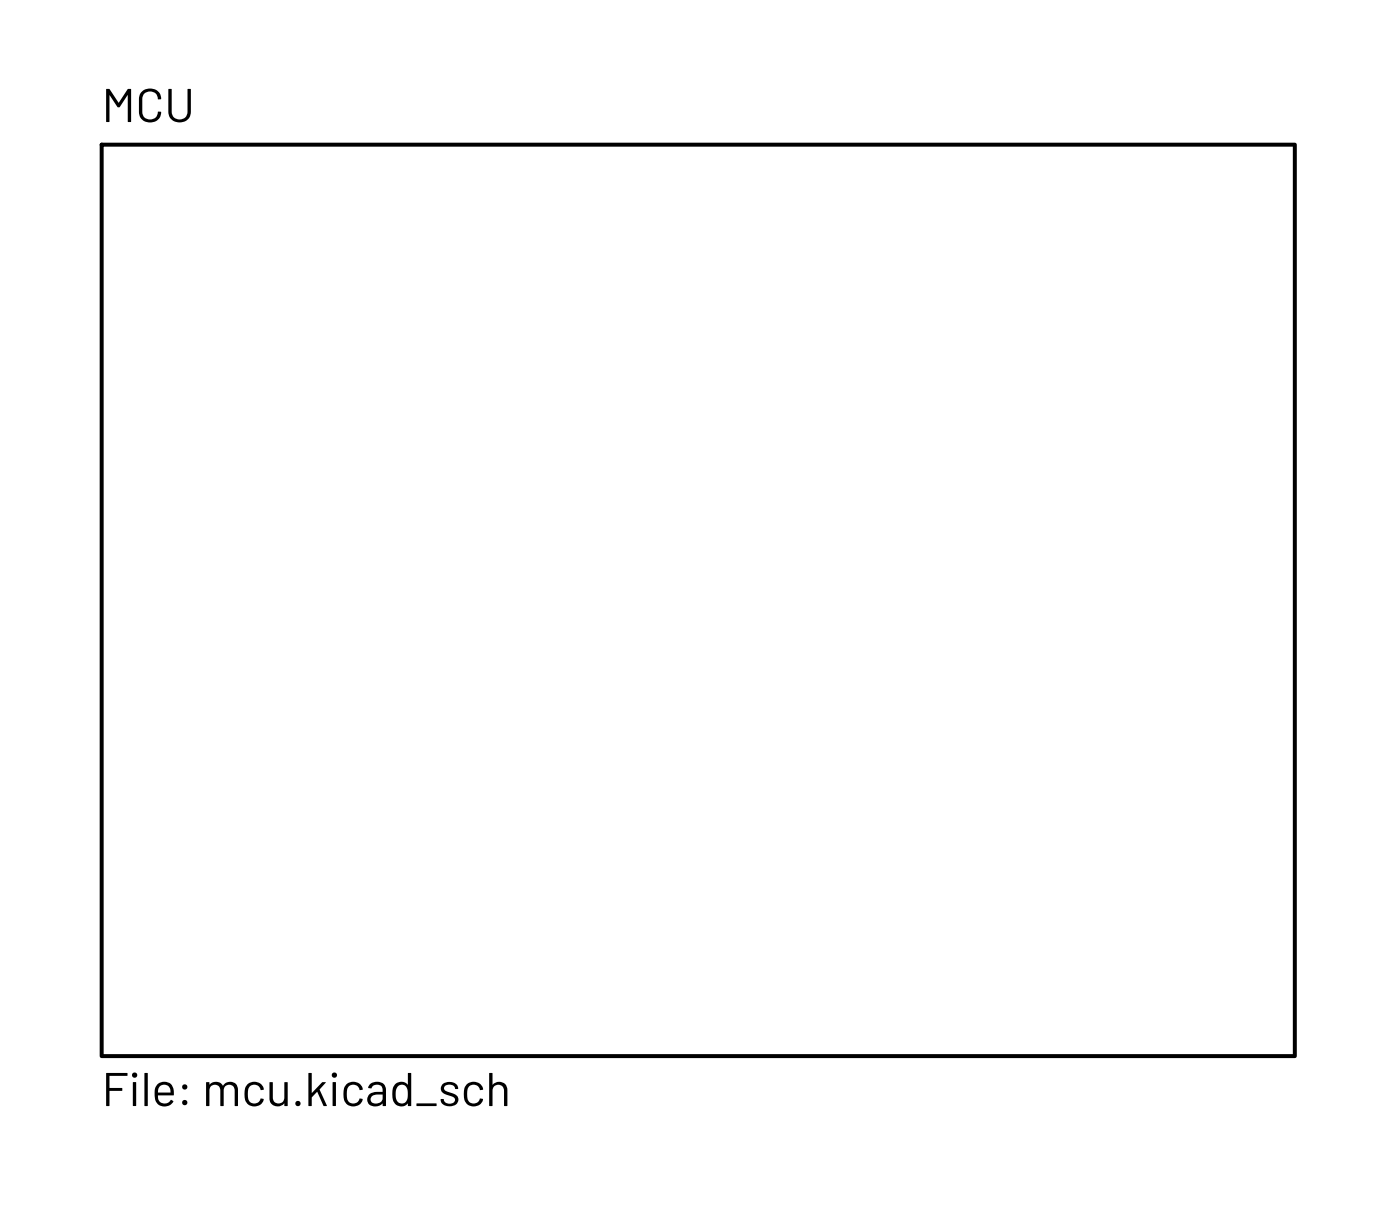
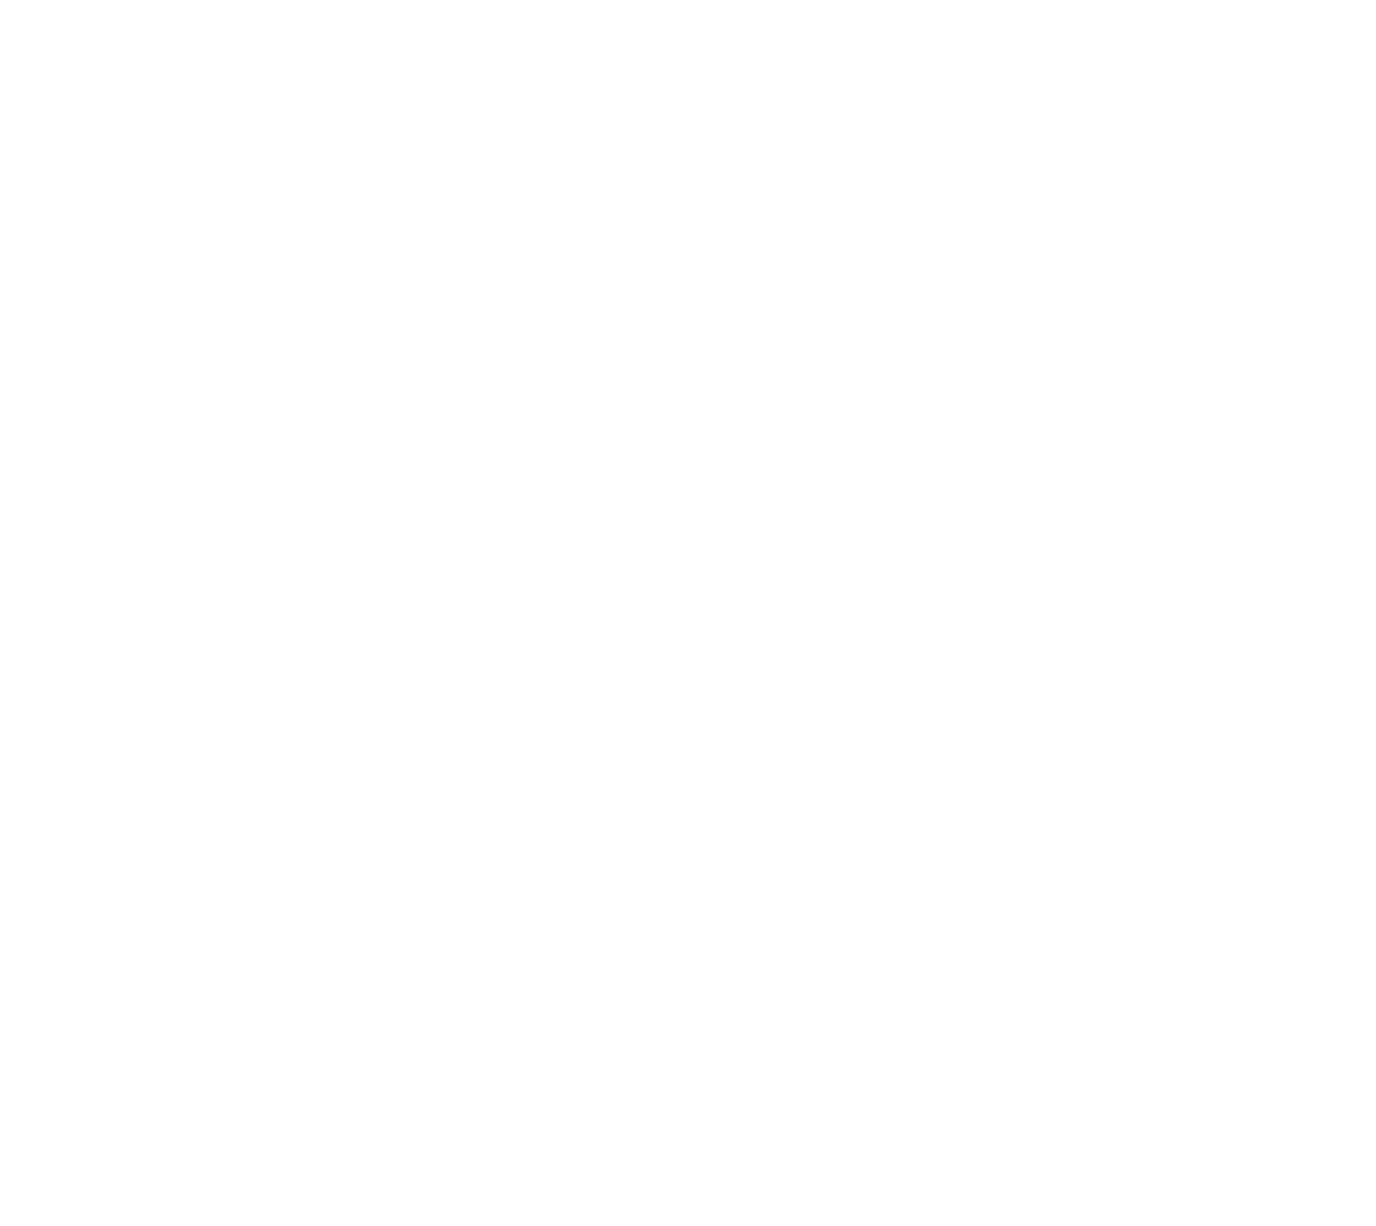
sheet MCU: File: mcu.kicad_sch (698, 600) -> none

